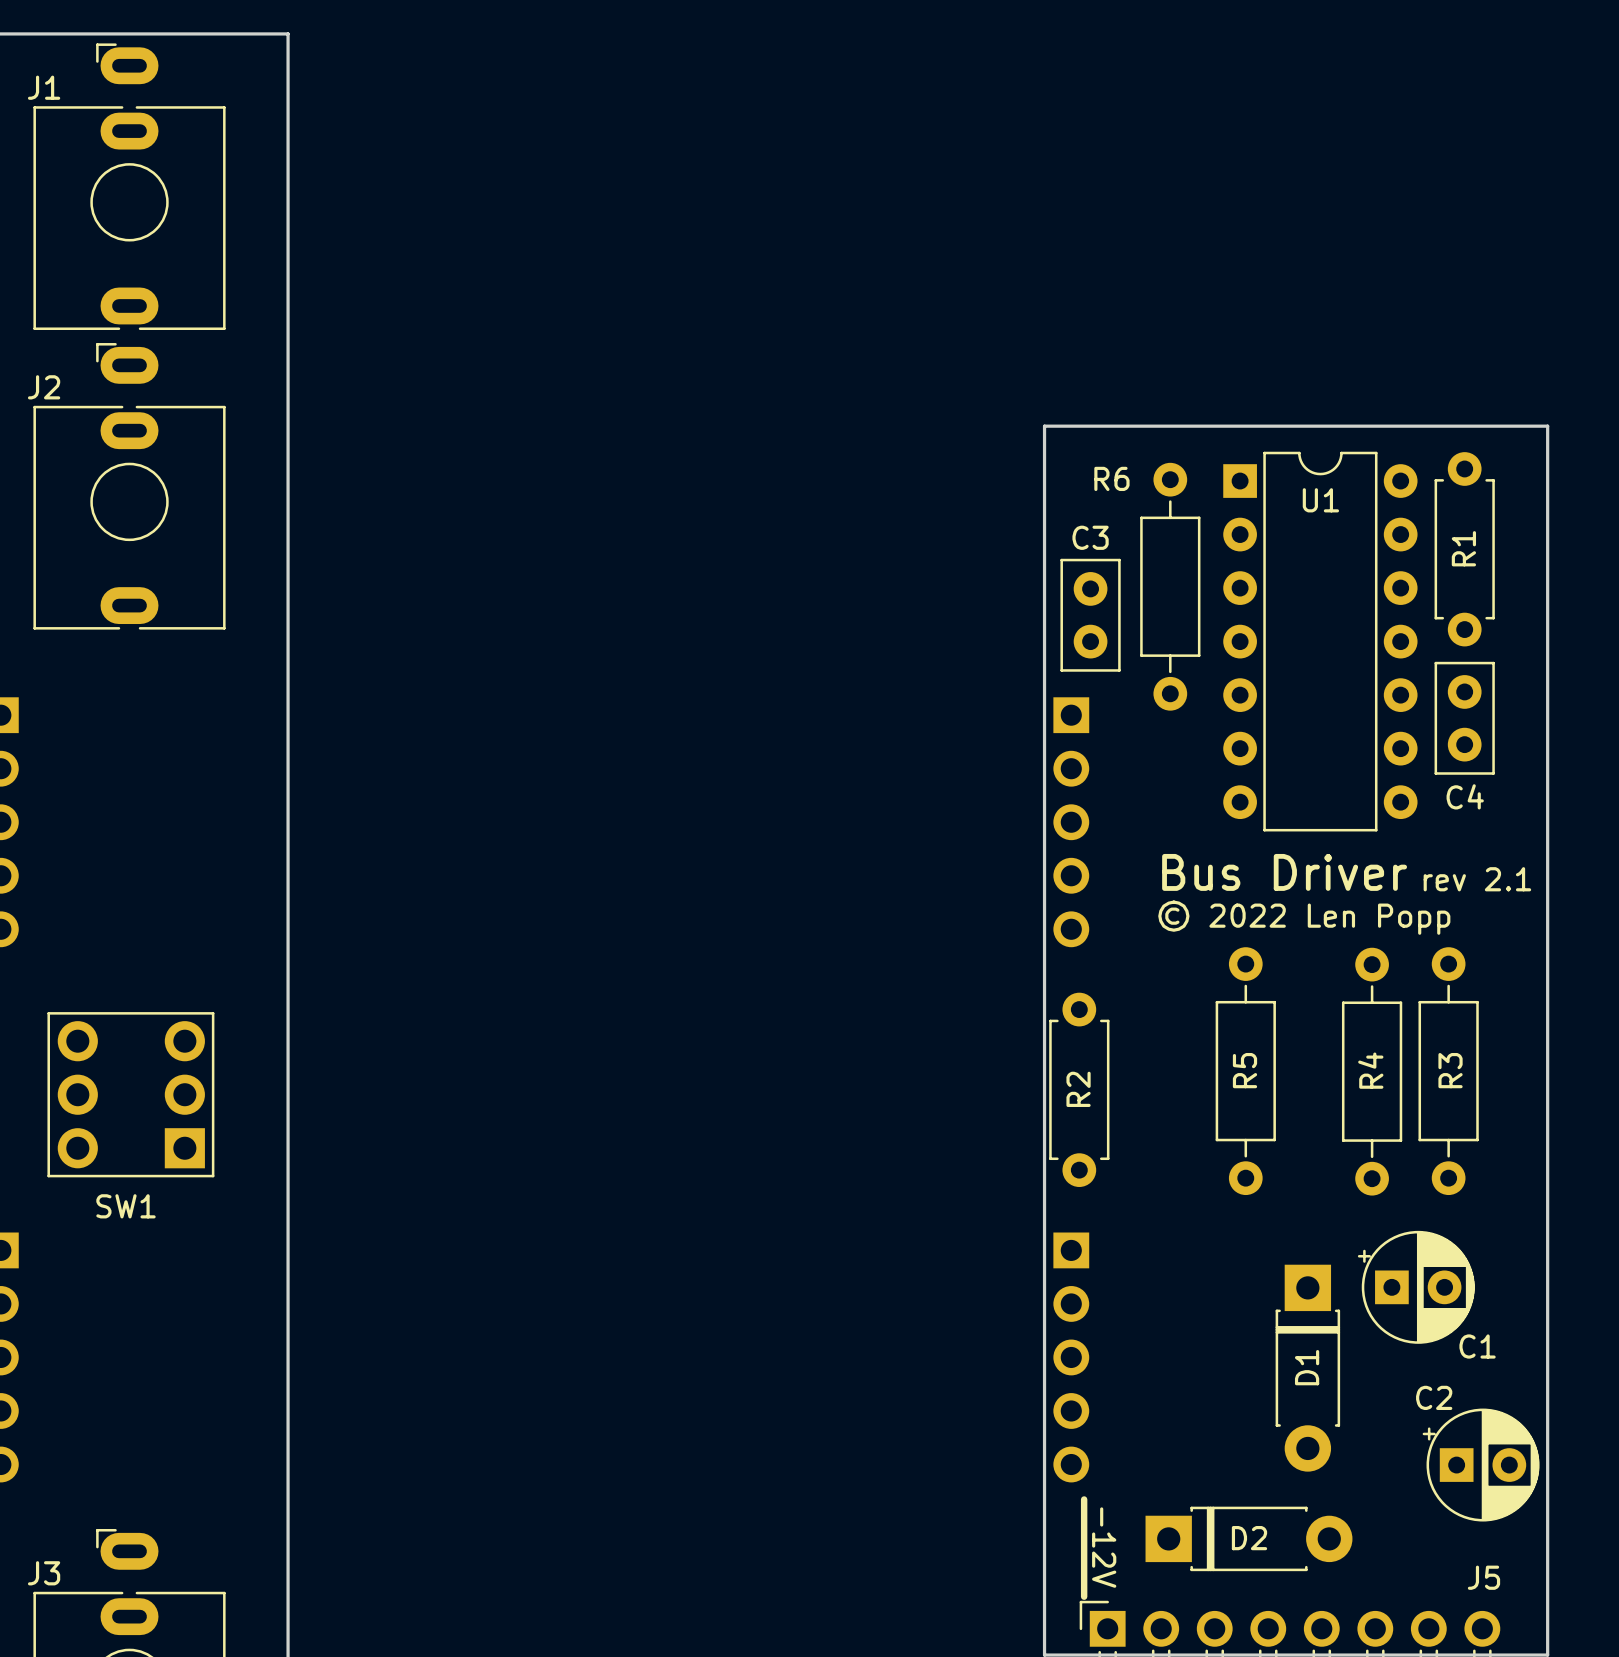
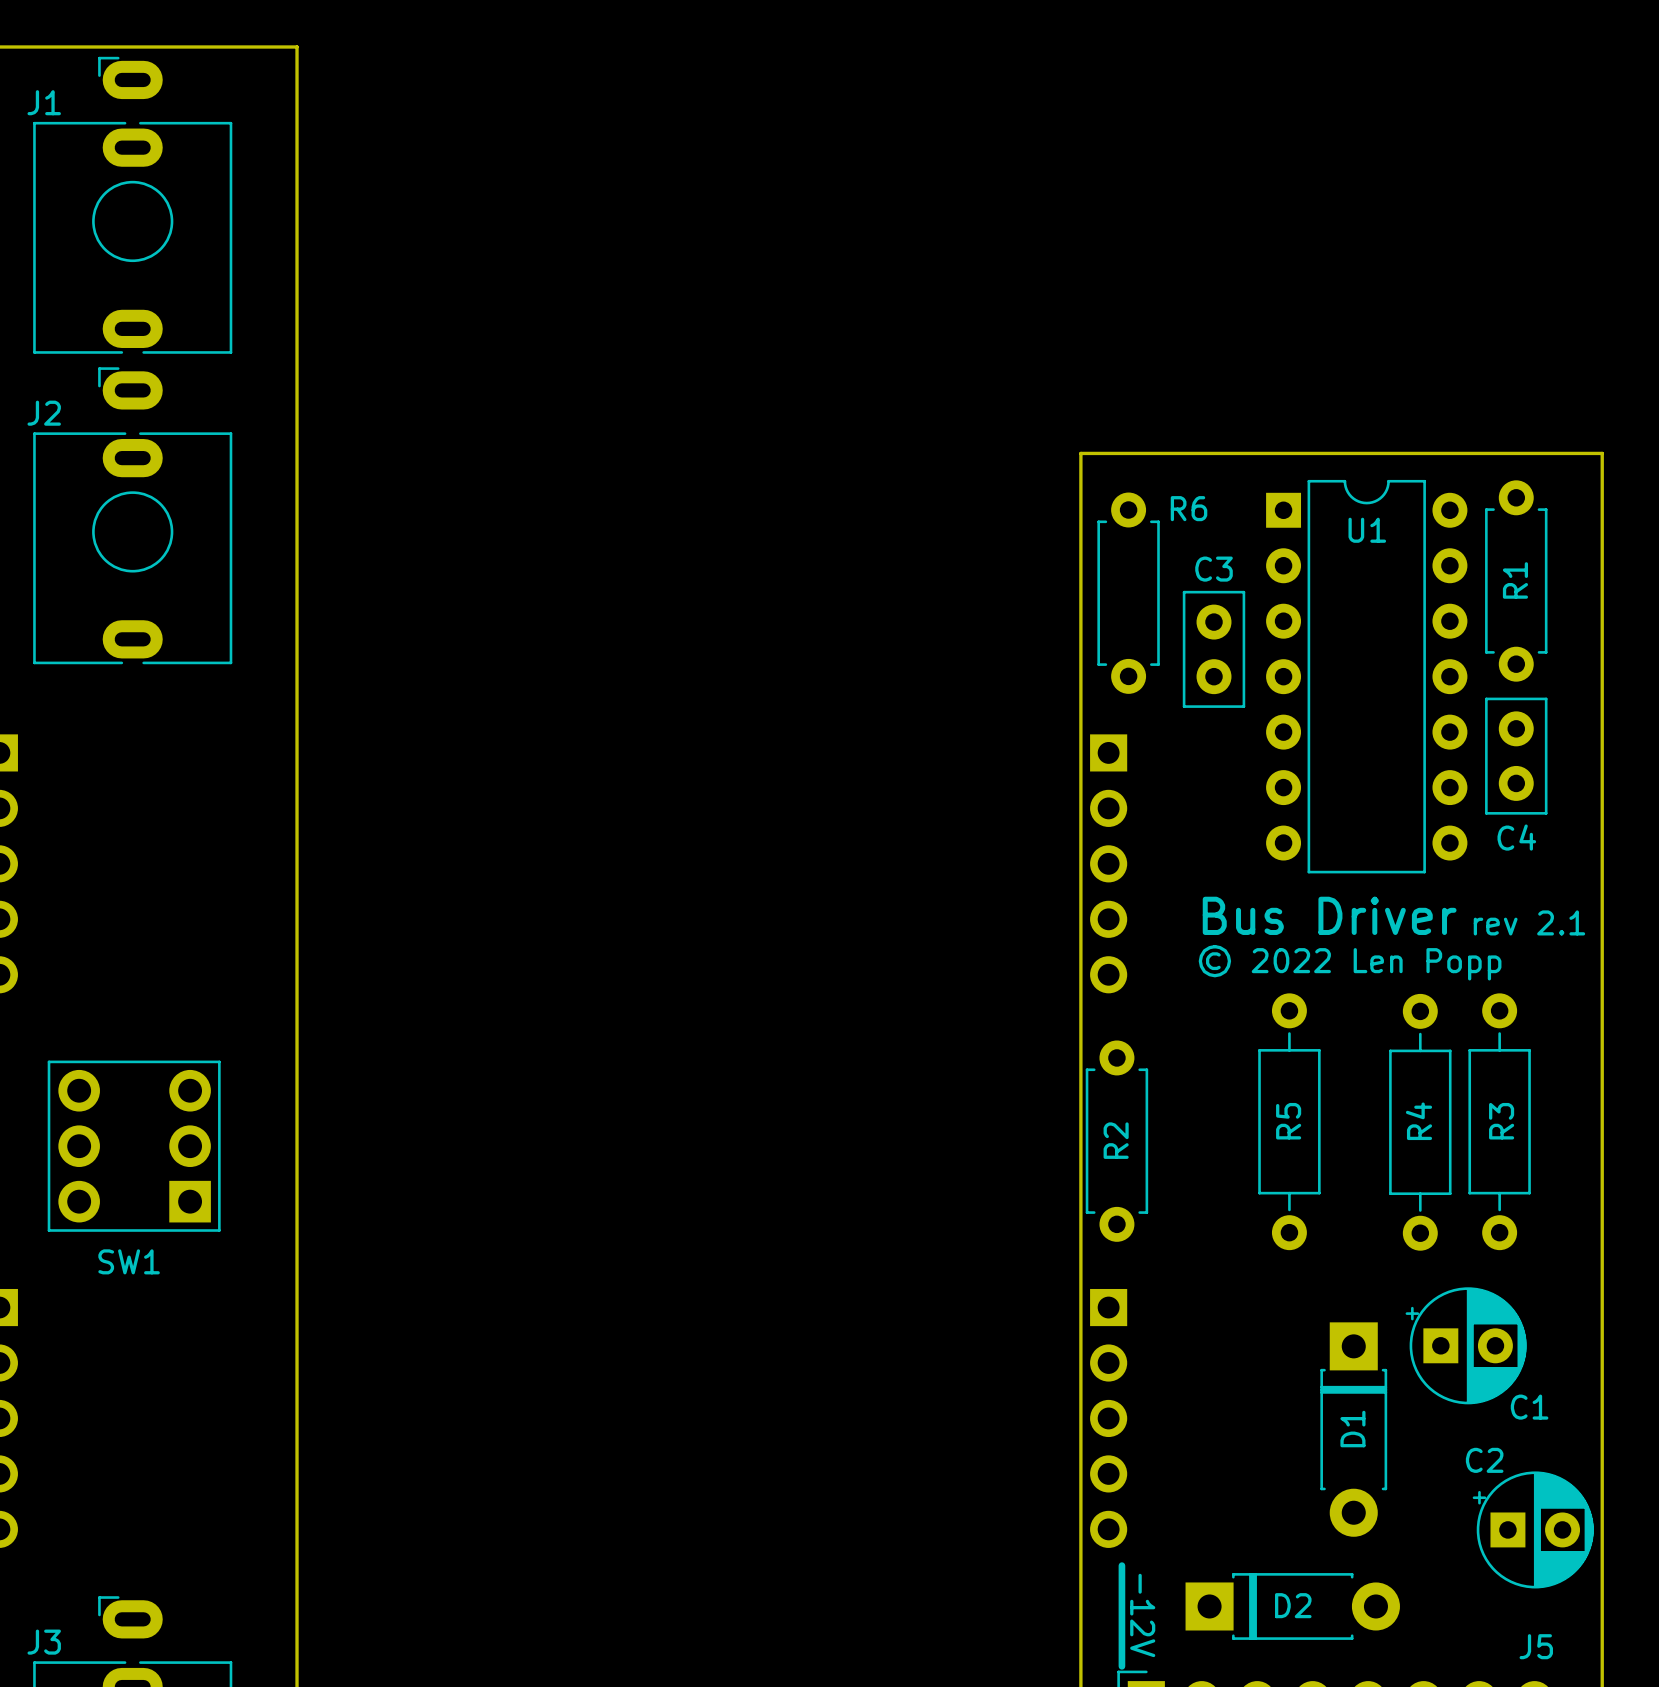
R6 footprint: [1140, 462, 1201, 711] -> [1097, 492, 1160, 694]
R6 name position: R6 (1111, 478) -> R6 (1189, 508)
C3 position: (1090, 615) -> (1214, 649)

